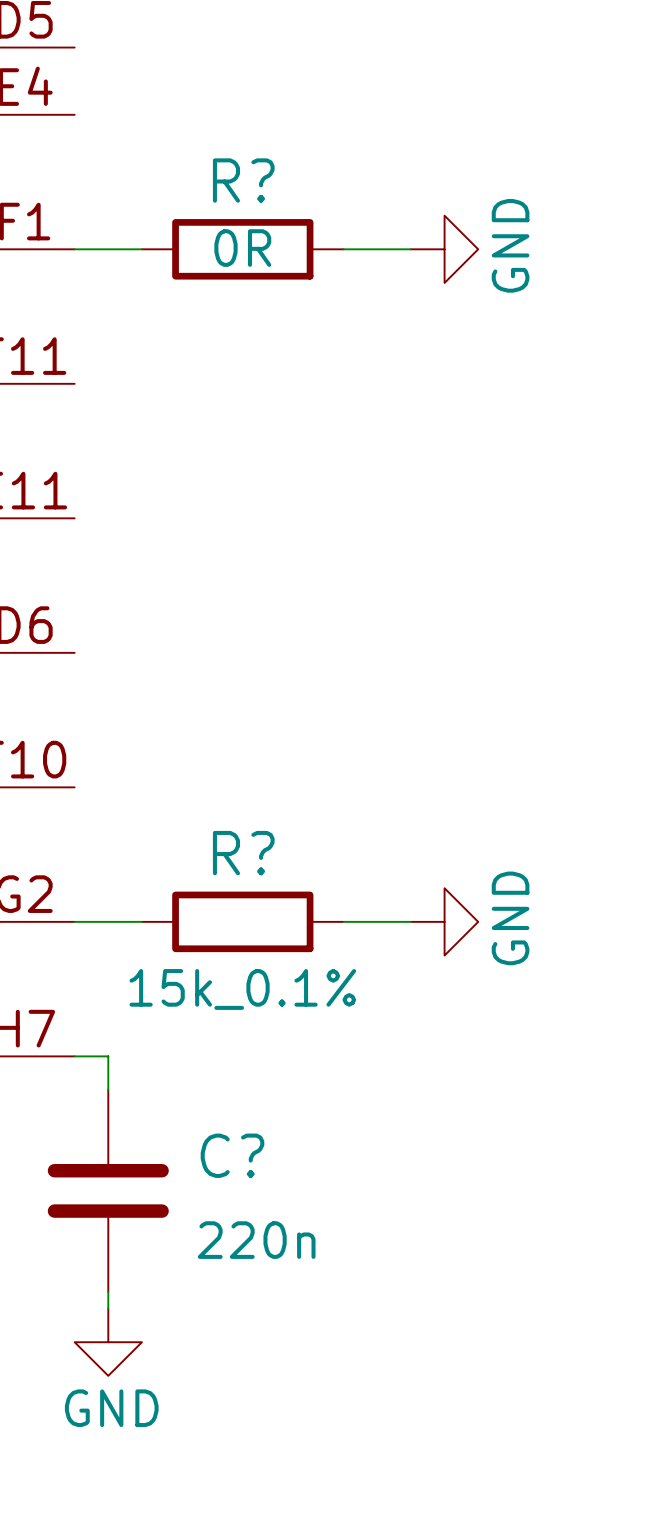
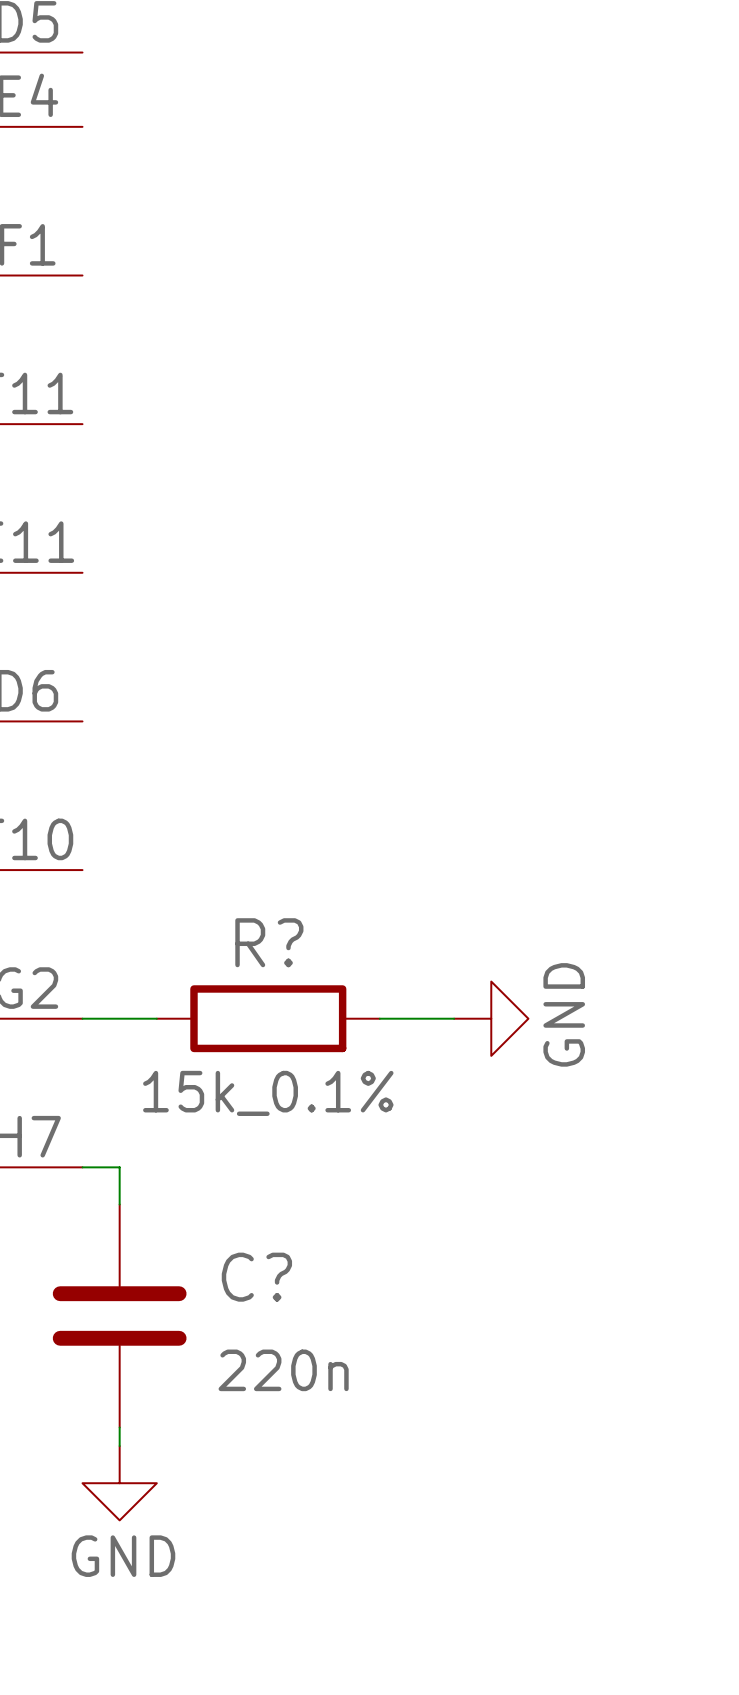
wire: (74, 249) (141, 249) -> none
R?: (242, 249) -> none
wire: (343, 249) (410, 249) -> none
power symbol: GND (444, 249) -> none

